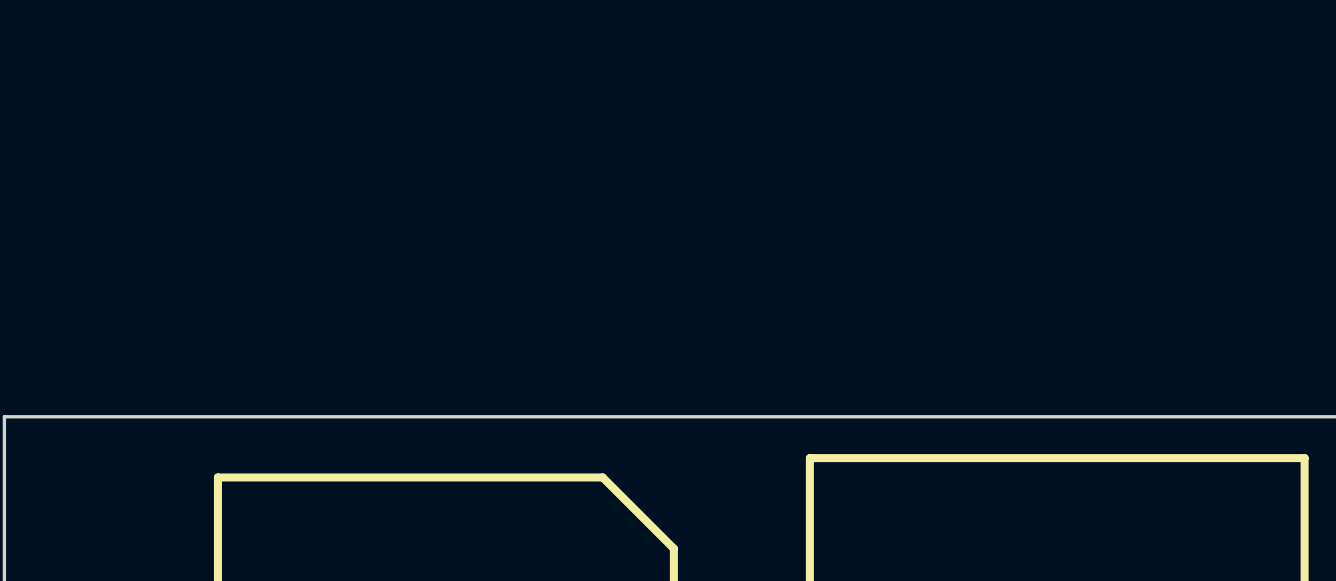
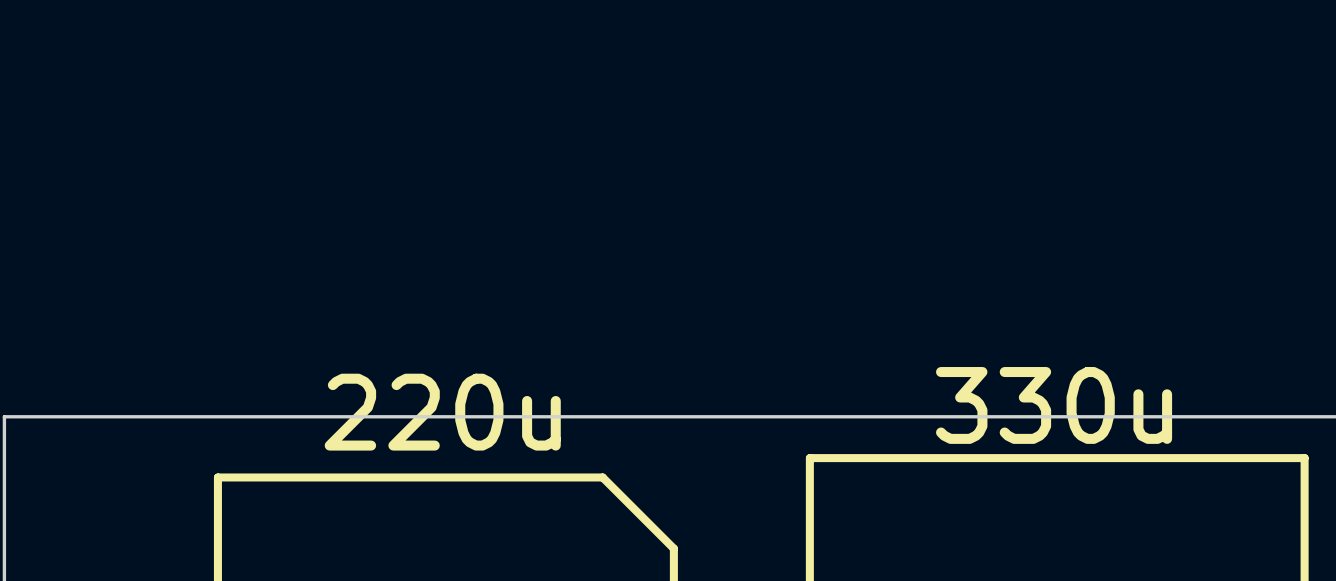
part value: none -> 330u (1054, 405)
part value: none -> 220u (442, 412)

